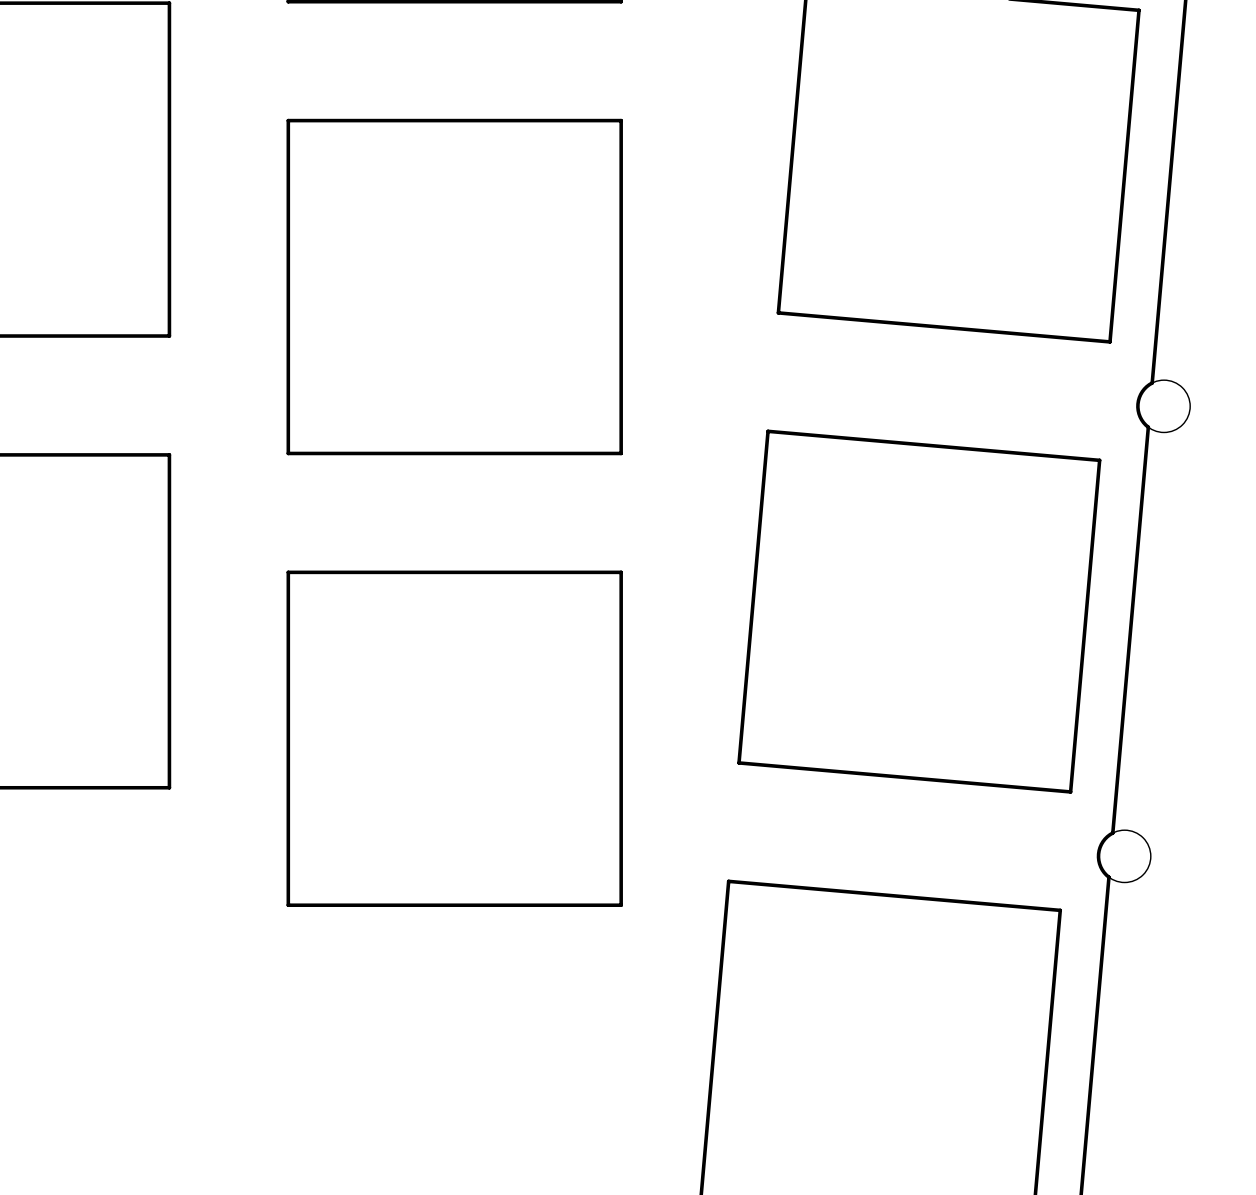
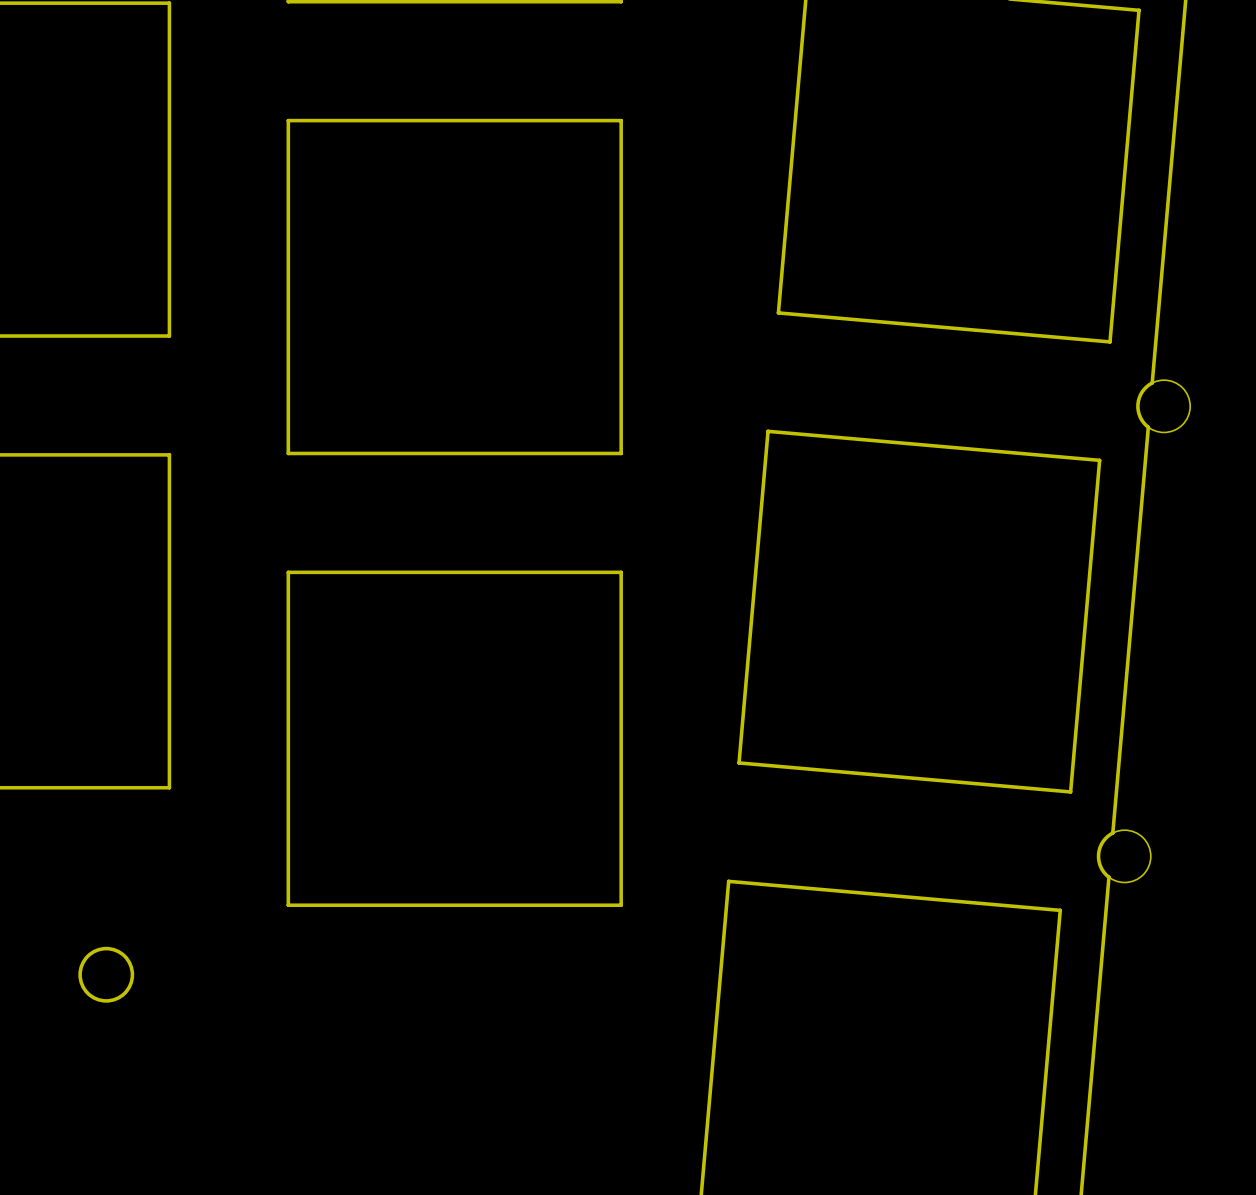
round board edge: none -> [78, 946, 135, 1003]

